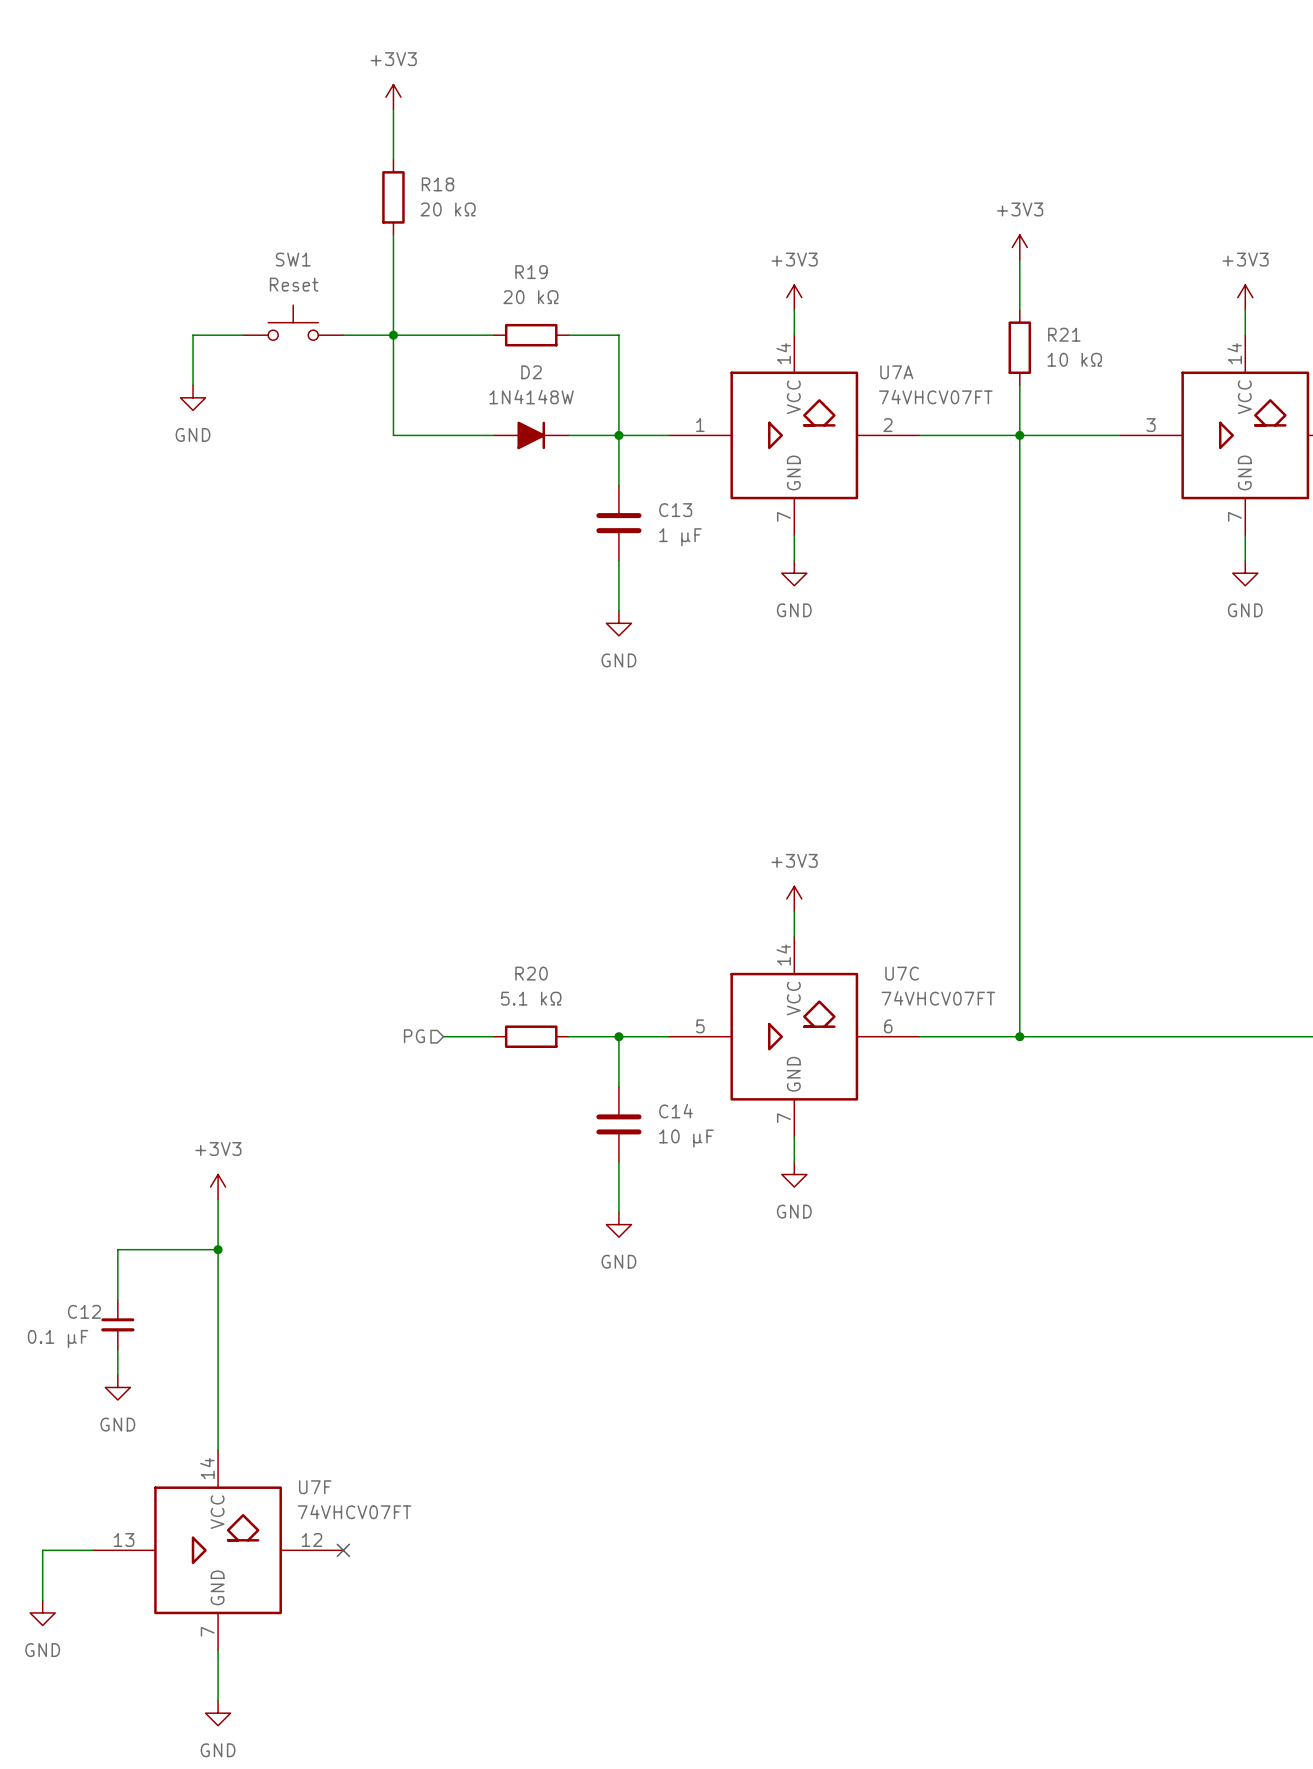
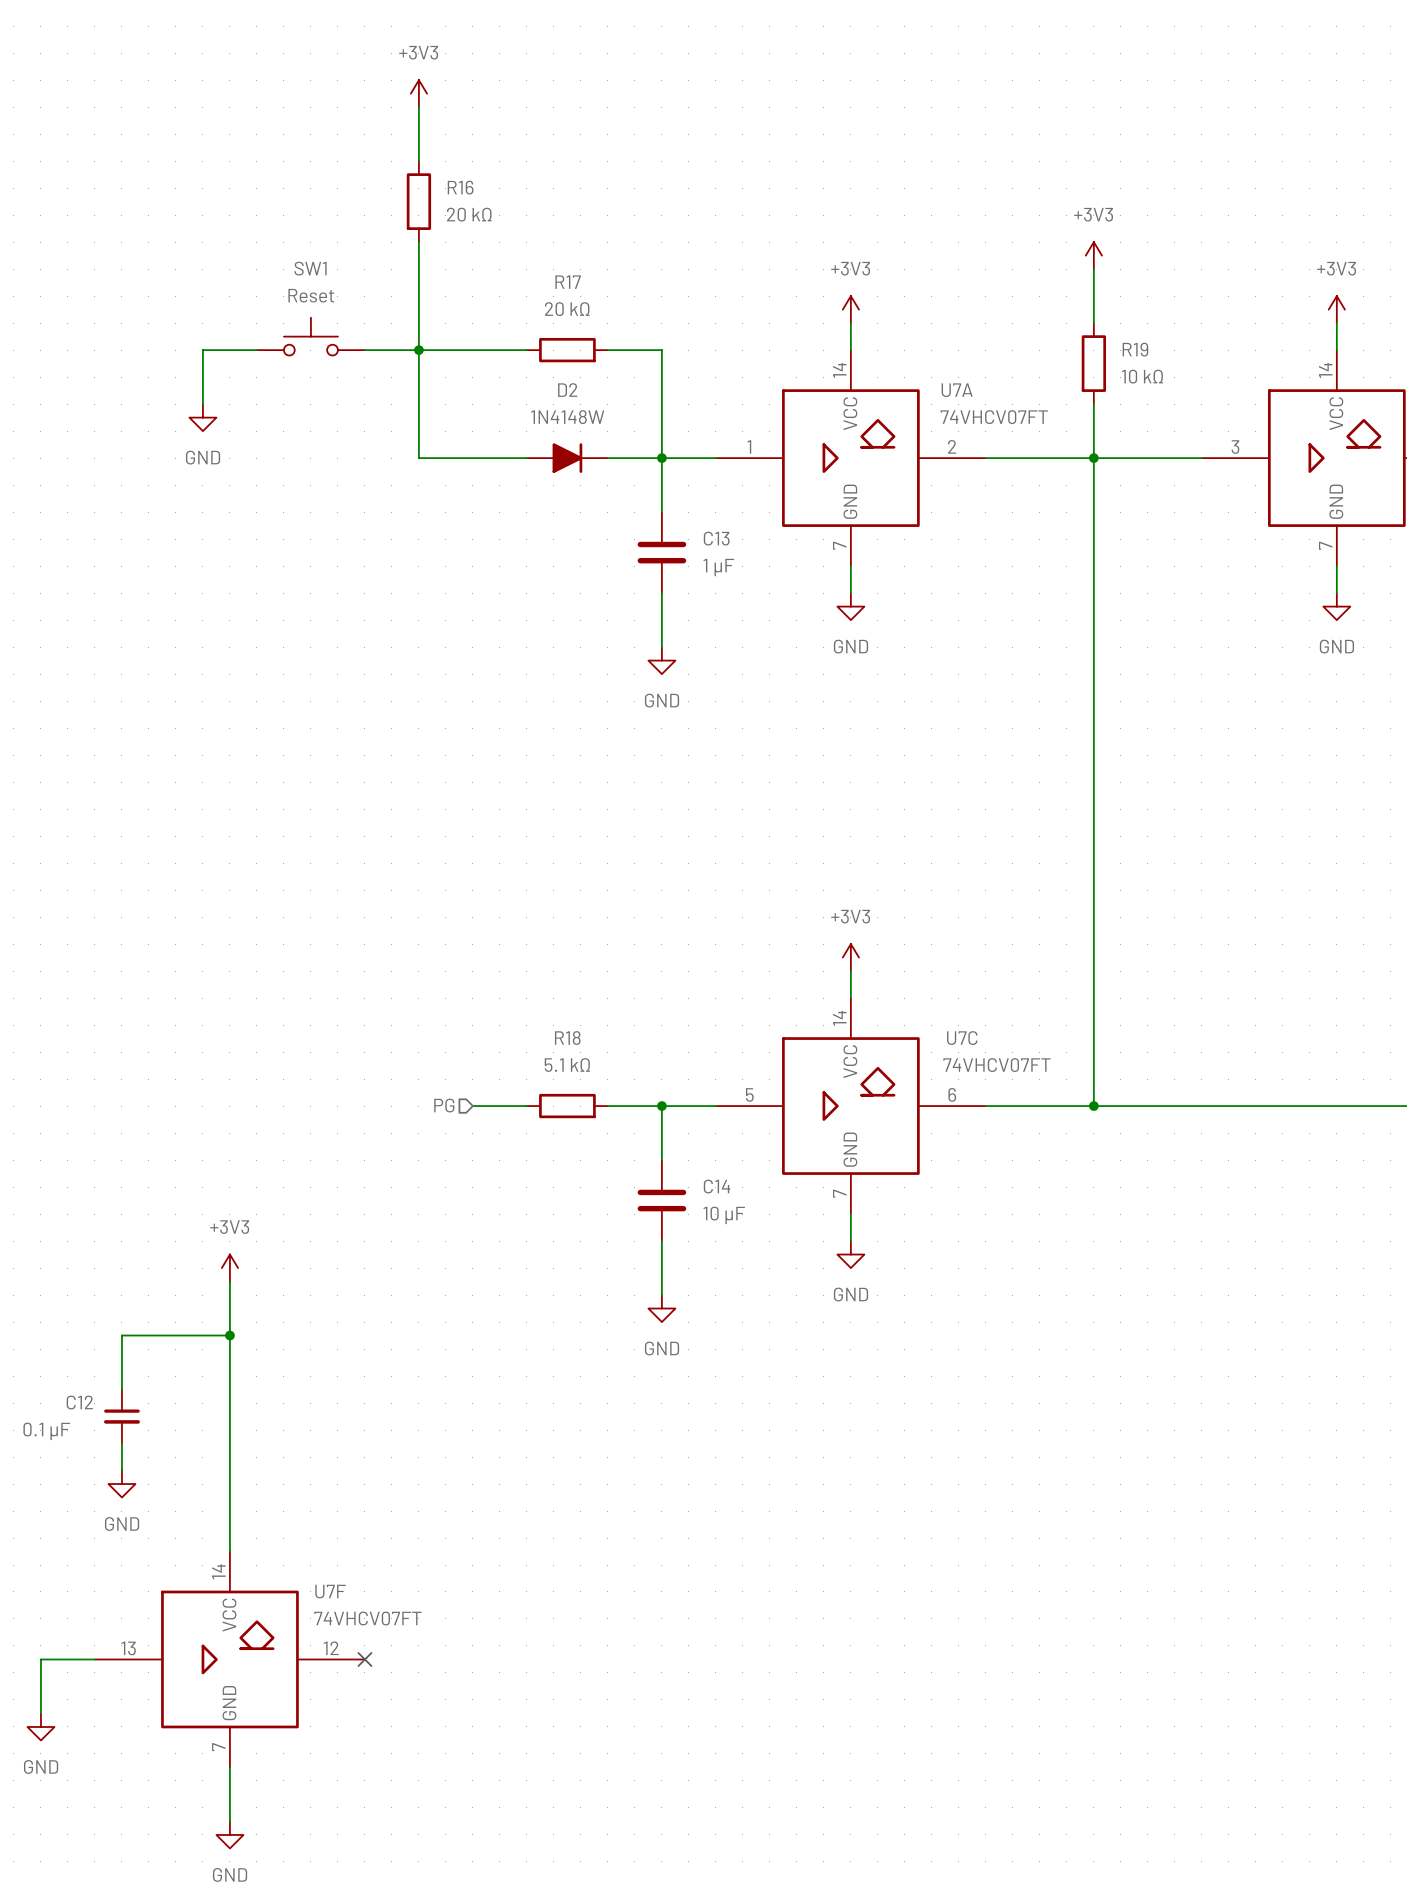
R18 name: R18 (437, 184) -> R16 (460, 187)
R19 name: R19 (531, 272) -> R17 (568, 282)
R21 name: R21 (1064, 334) -> R19 (1135, 349)
R20 name: R20 (531, 973) -> R18 (567, 1038)

